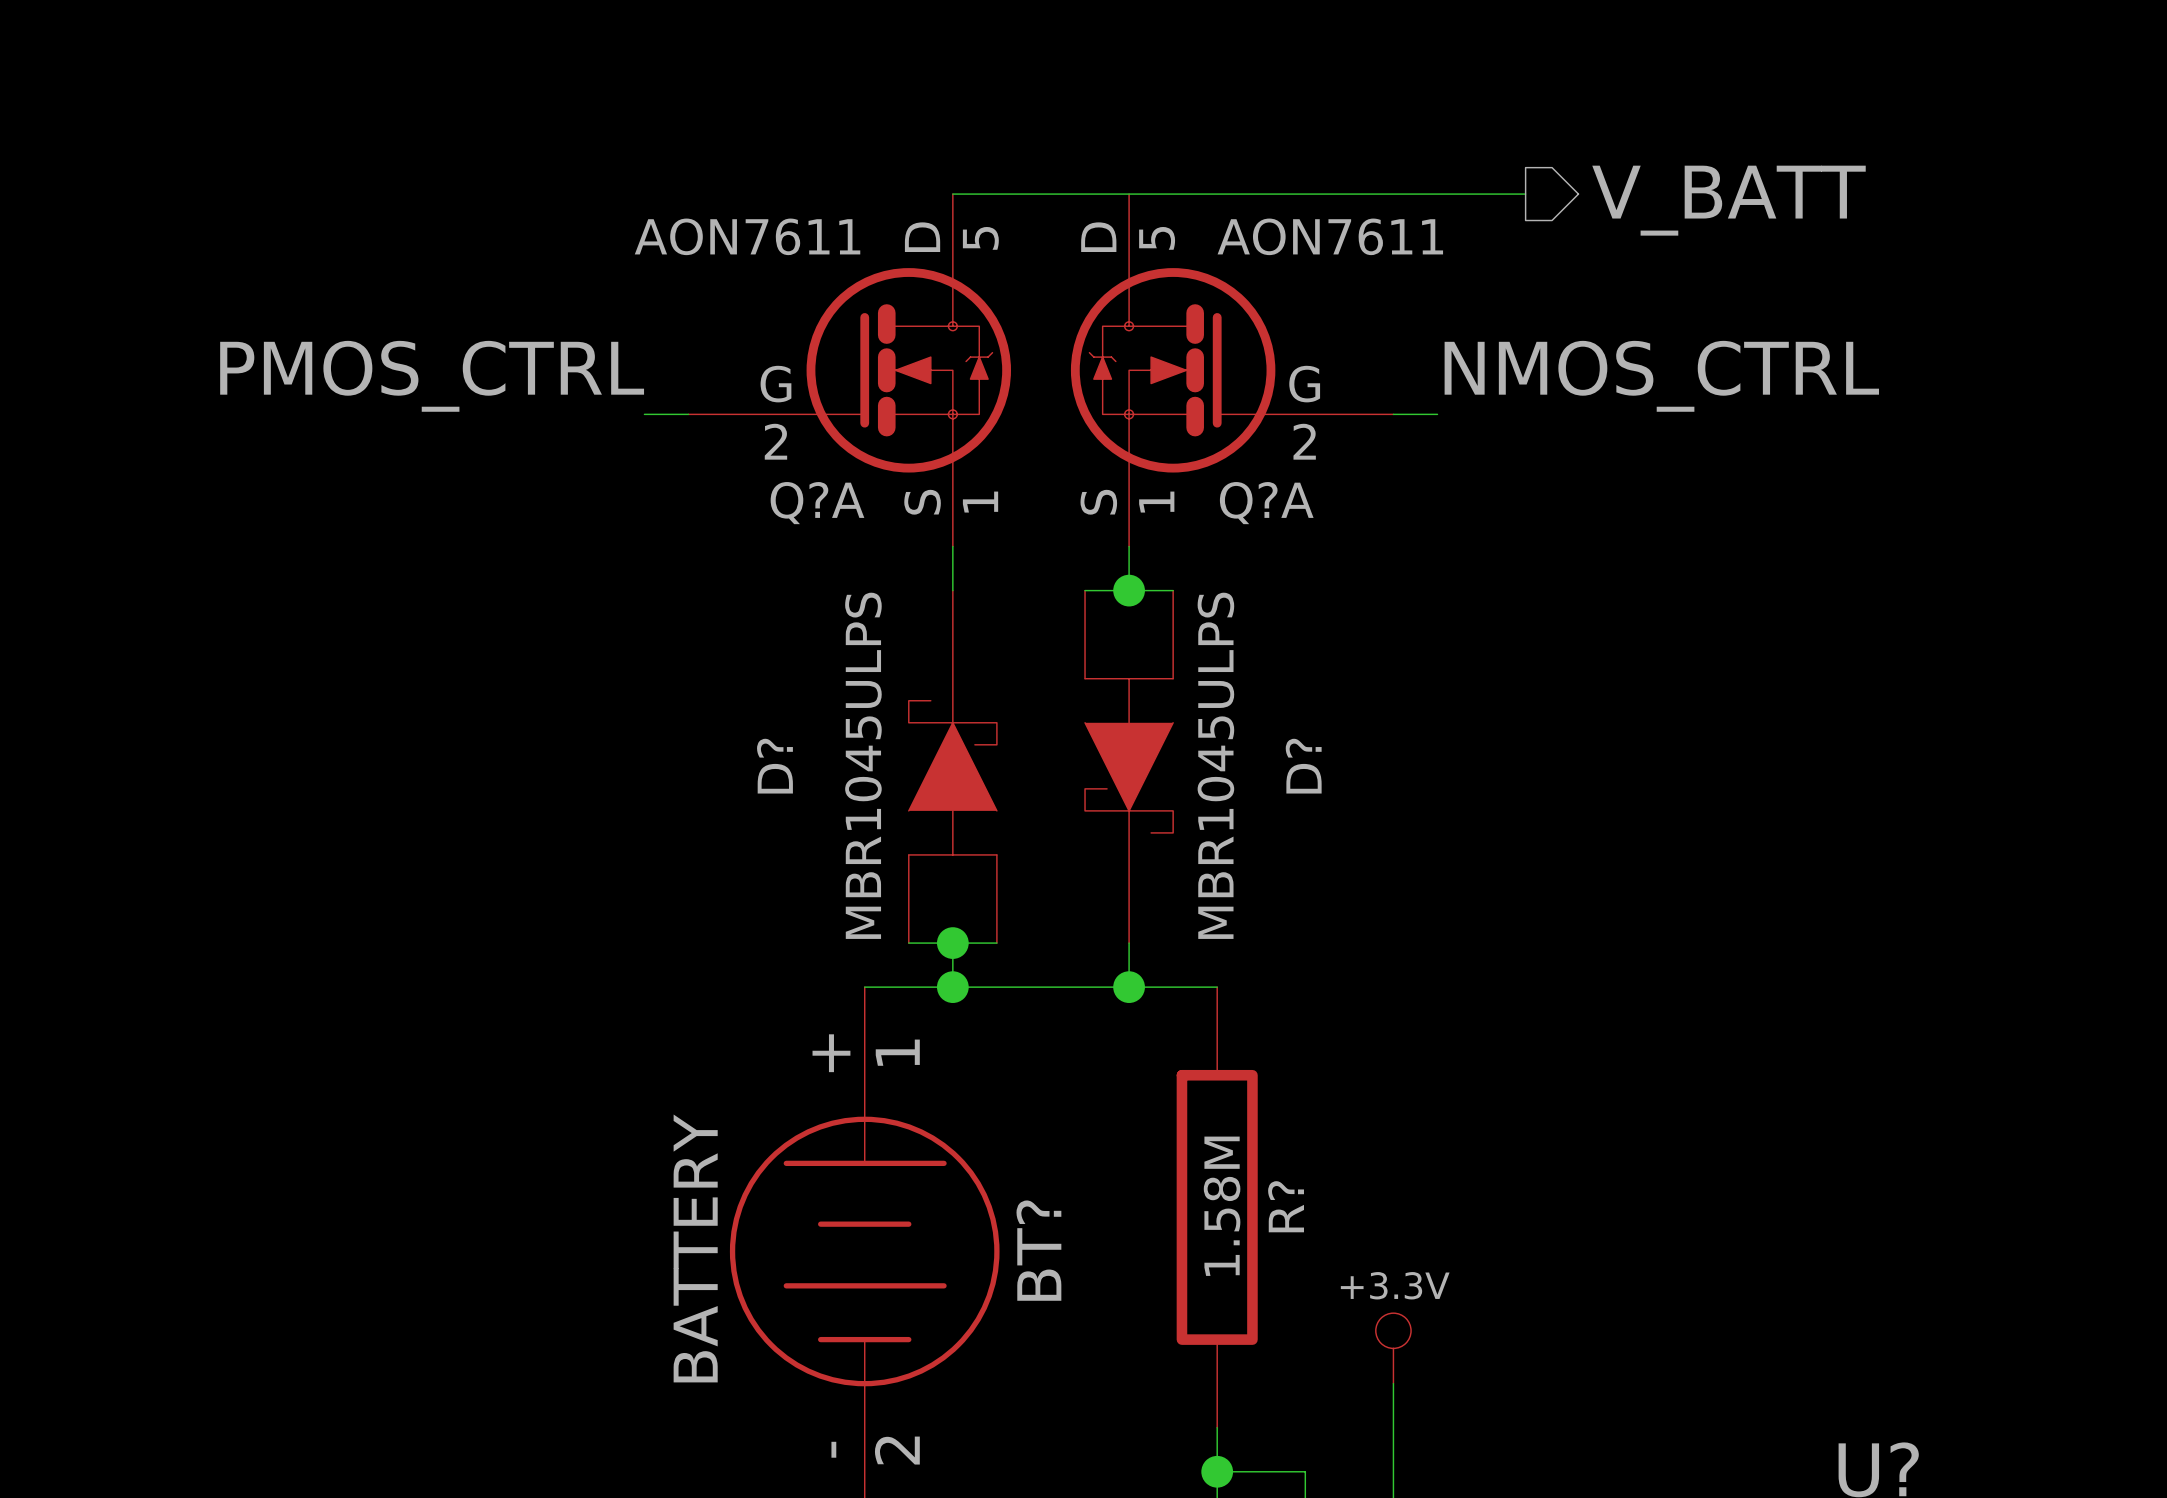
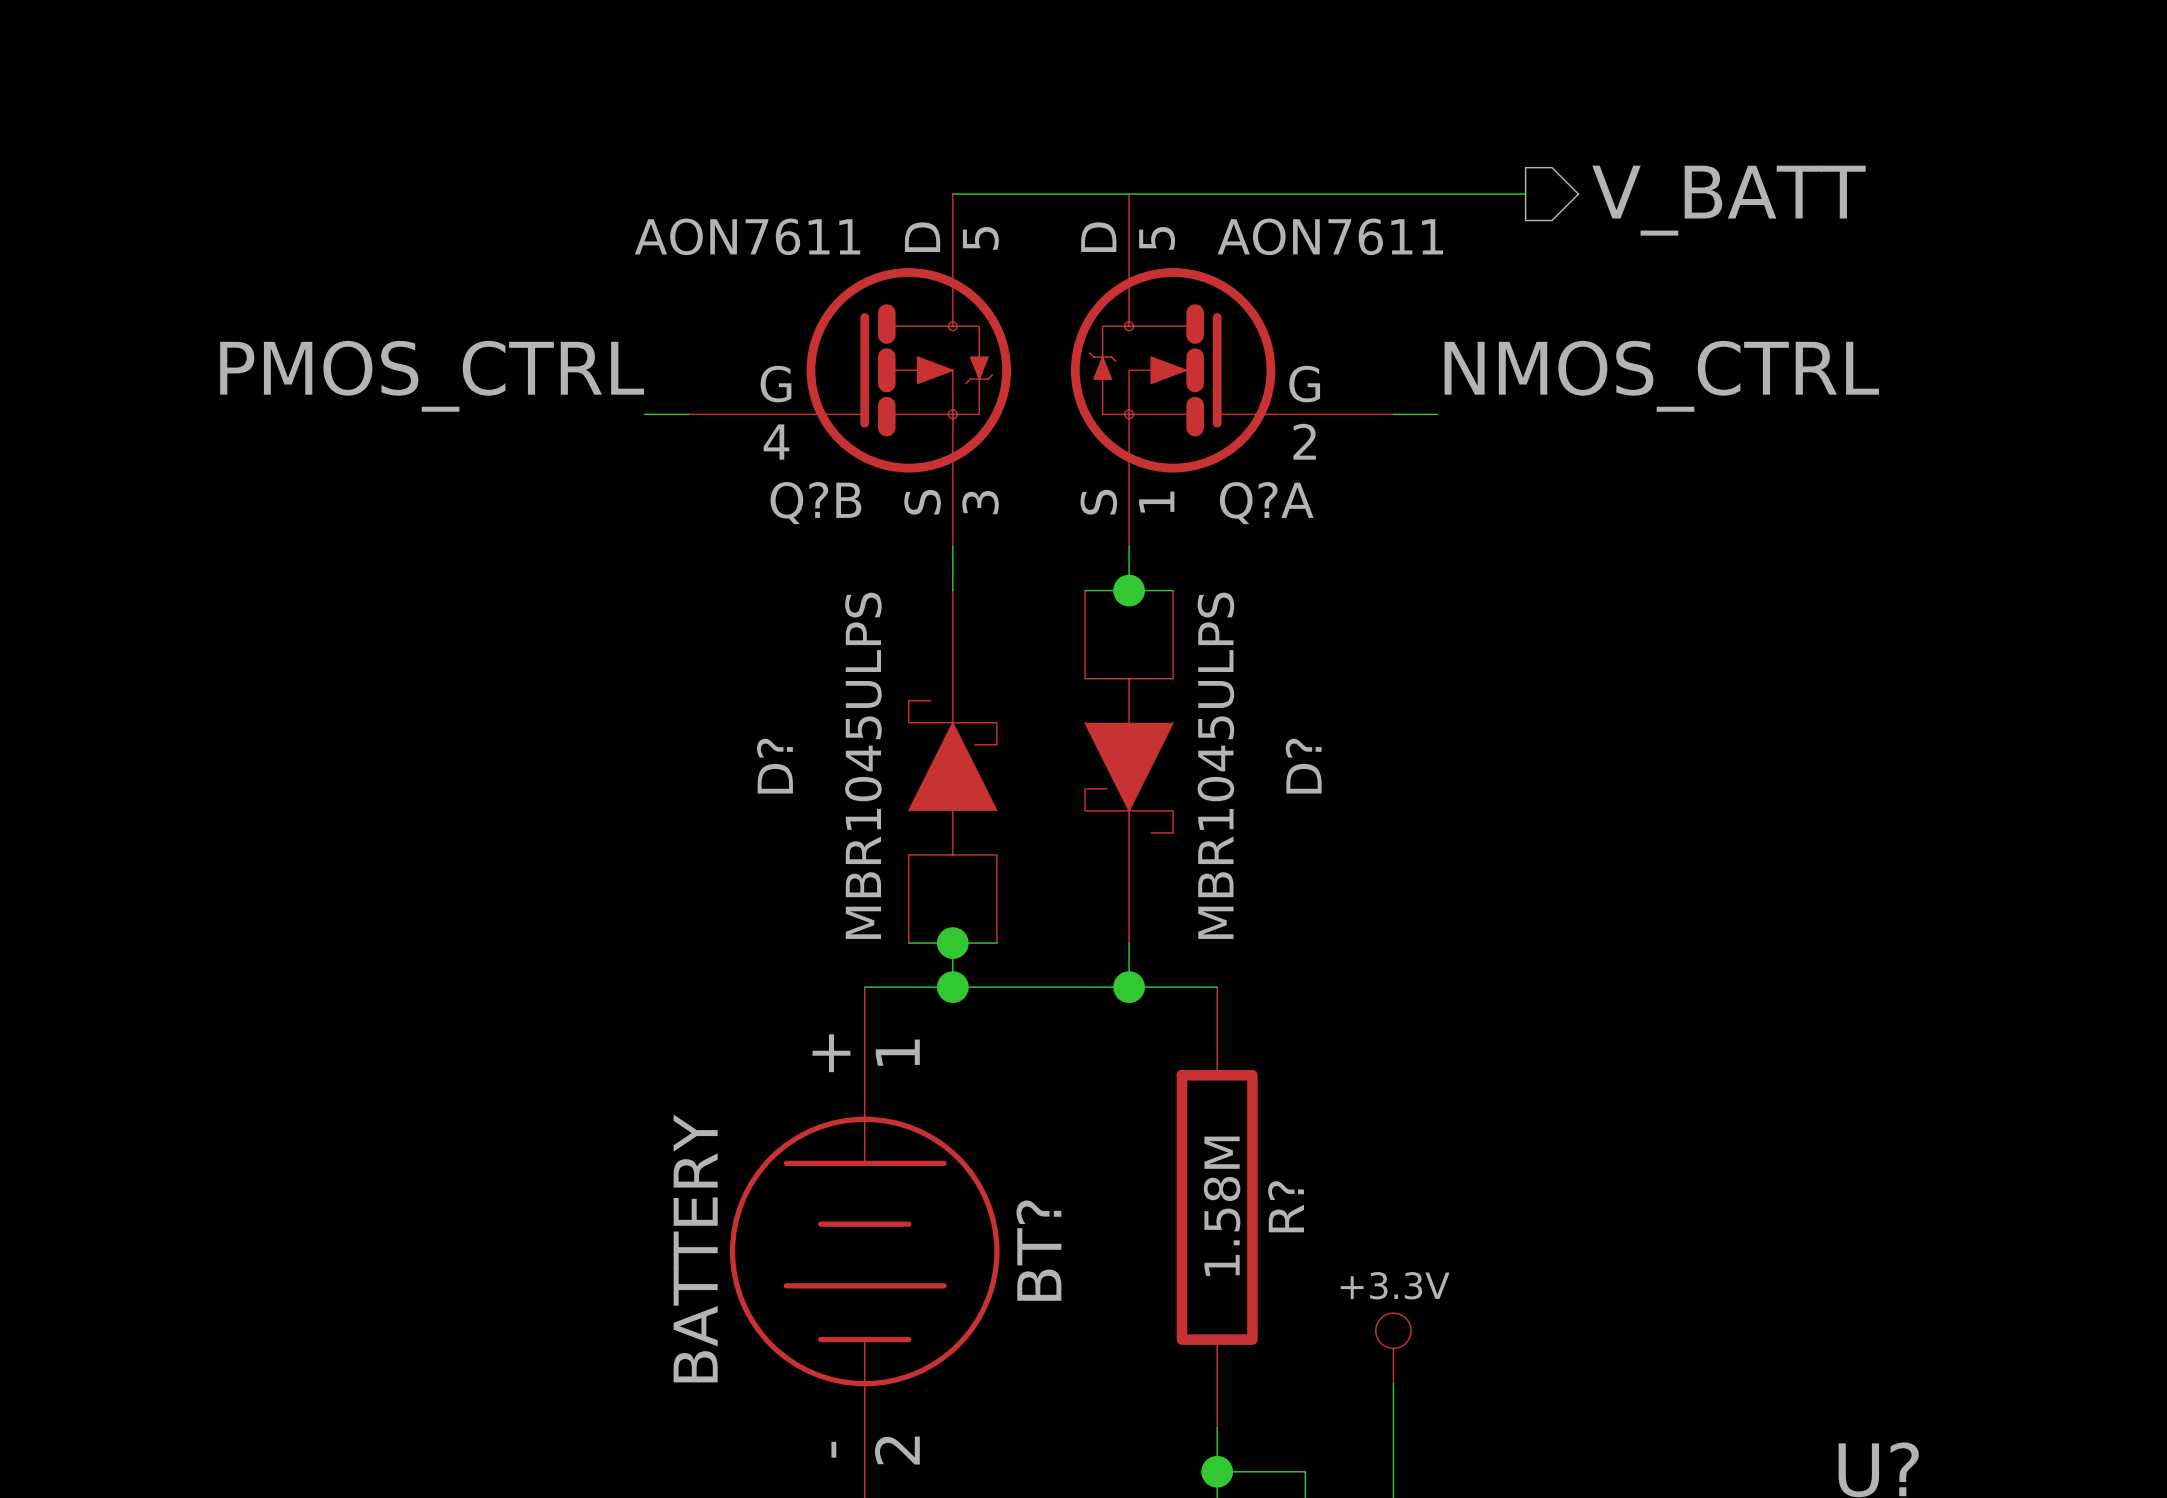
Q?A: AON7611 (849, 370) -> none
Q?B: none -> AON7611 (849, 370)

